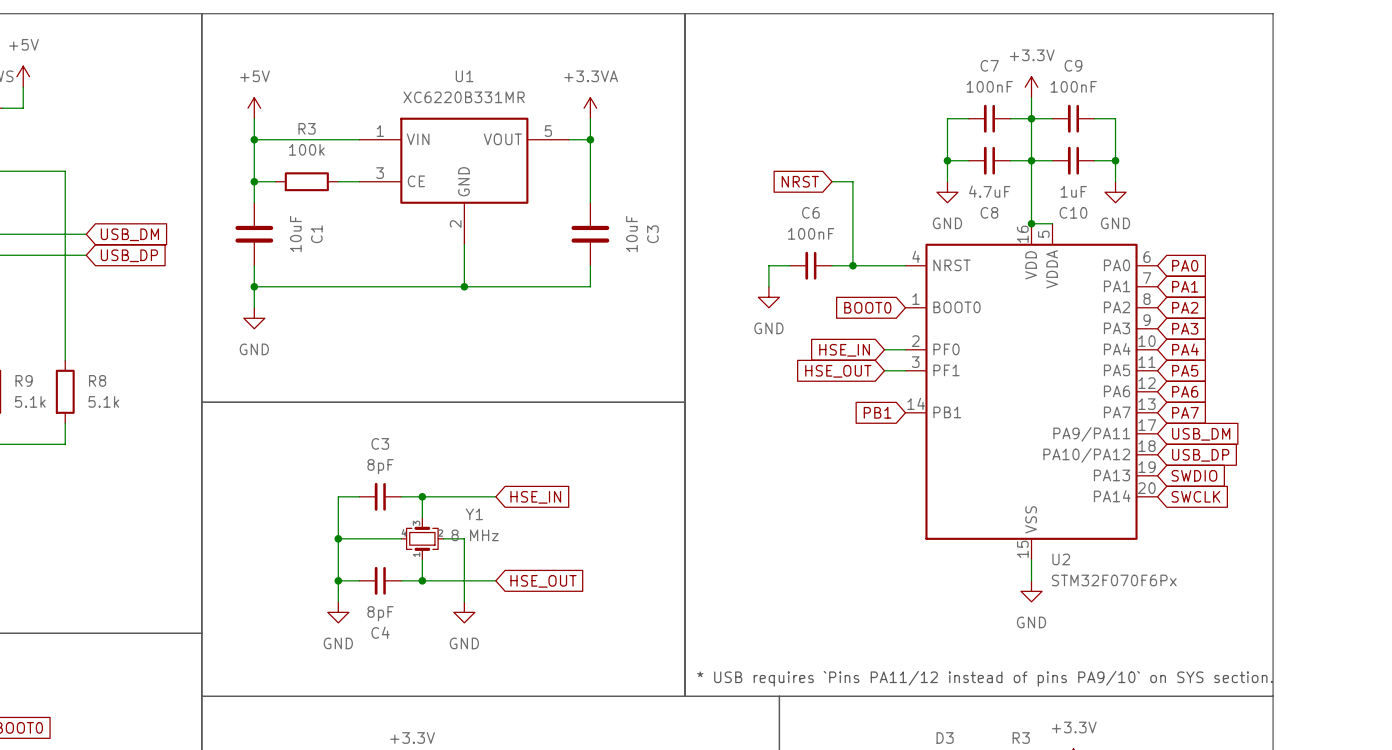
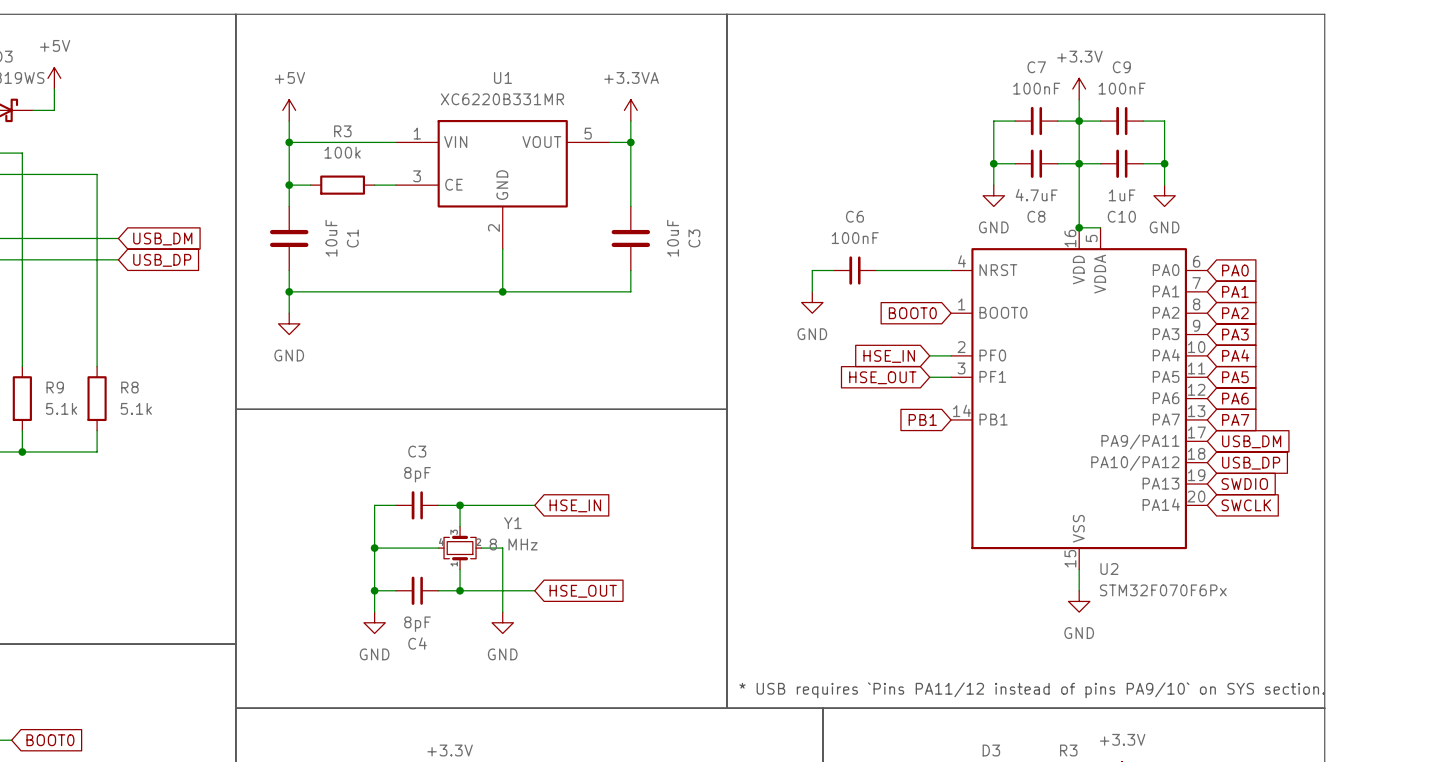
global label: NRST (800, 181) -> none
wire: (831, 181) (852, 181) (852, 265) -> none
junction: (852, 265) -> none

